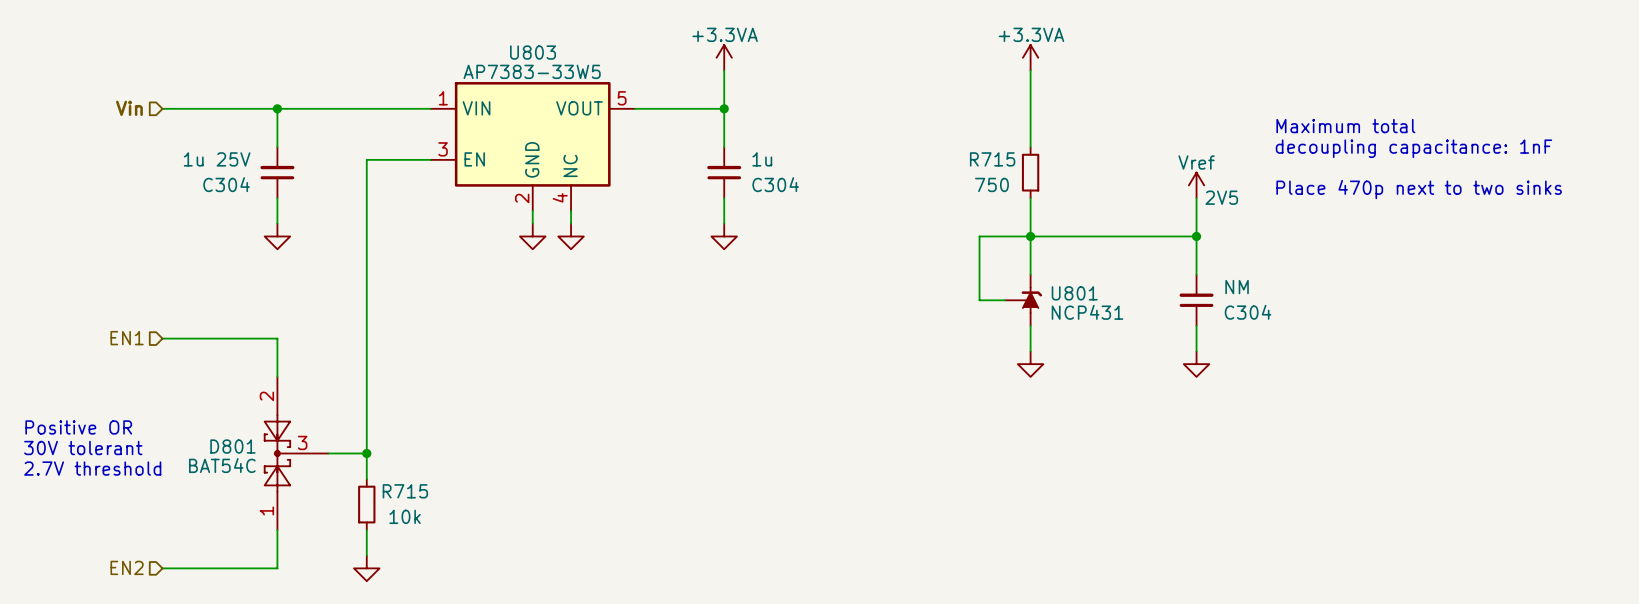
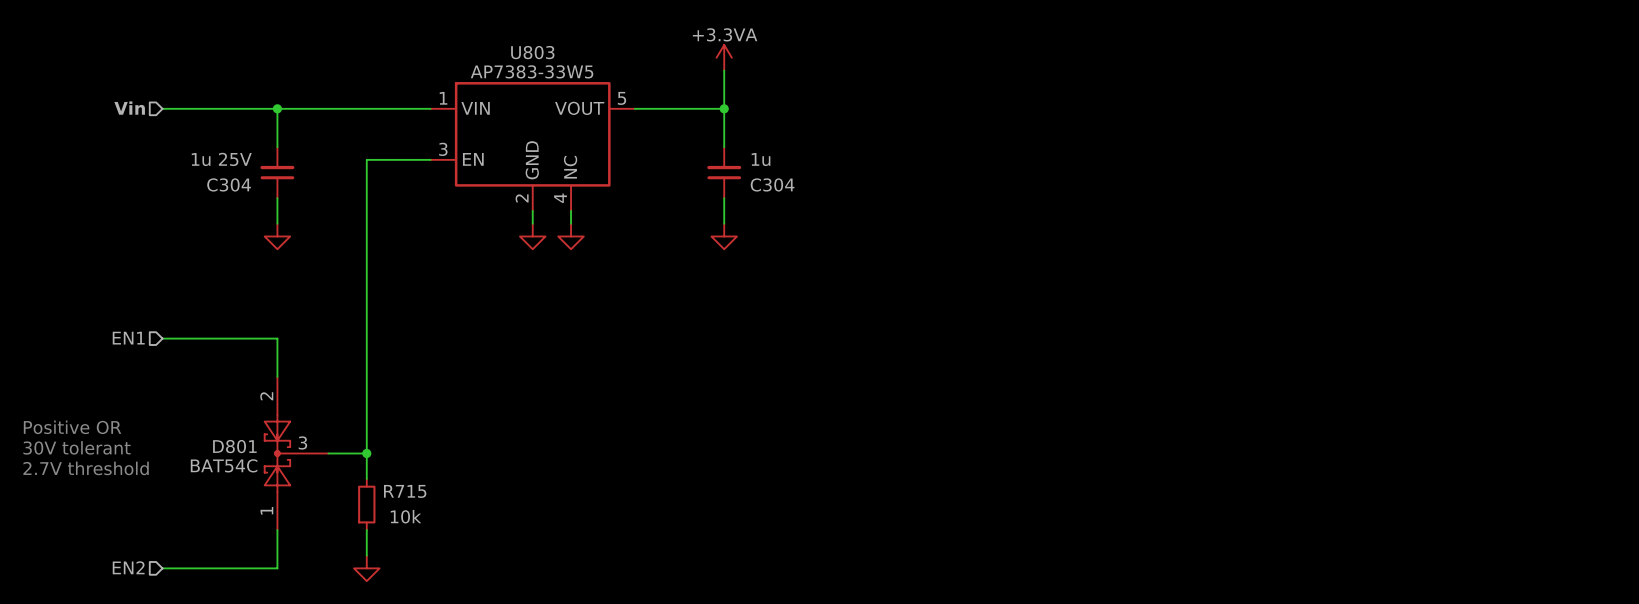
power symbol: +3.3VA (1030, 57) -> none
wire: (1030, 70) (1030, 147) -> none
text: Maximum total (1345, 126) -> none
text: decoupling capacitance: 1nF (1413, 148) -> none
R715: 750 (1030, 172) -> none
power symbol: Vref (1196, 185) -> none
text: Place 470p next to two sinks (1419, 189) -> none
wire: (1030, 198) (1030, 274) -> none
wire: (1196, 198) (1196, 274) -> none
junction: (1030, 236) -> none
wire: (1196, 236) (979, 236) (979, 300) (1005, 300) -> none
junction: (1196, 236) -> none
U801: NCP431 (1023, 300) -> none
C304: NM (1196, 300) -> none
wire: (1030, 325) (1030, 351) -> none
wire: (1196, 325) (1196, 351) -> none
power symbol: (1030, 364) -> none
power symbol: (1196, 364) -> none

